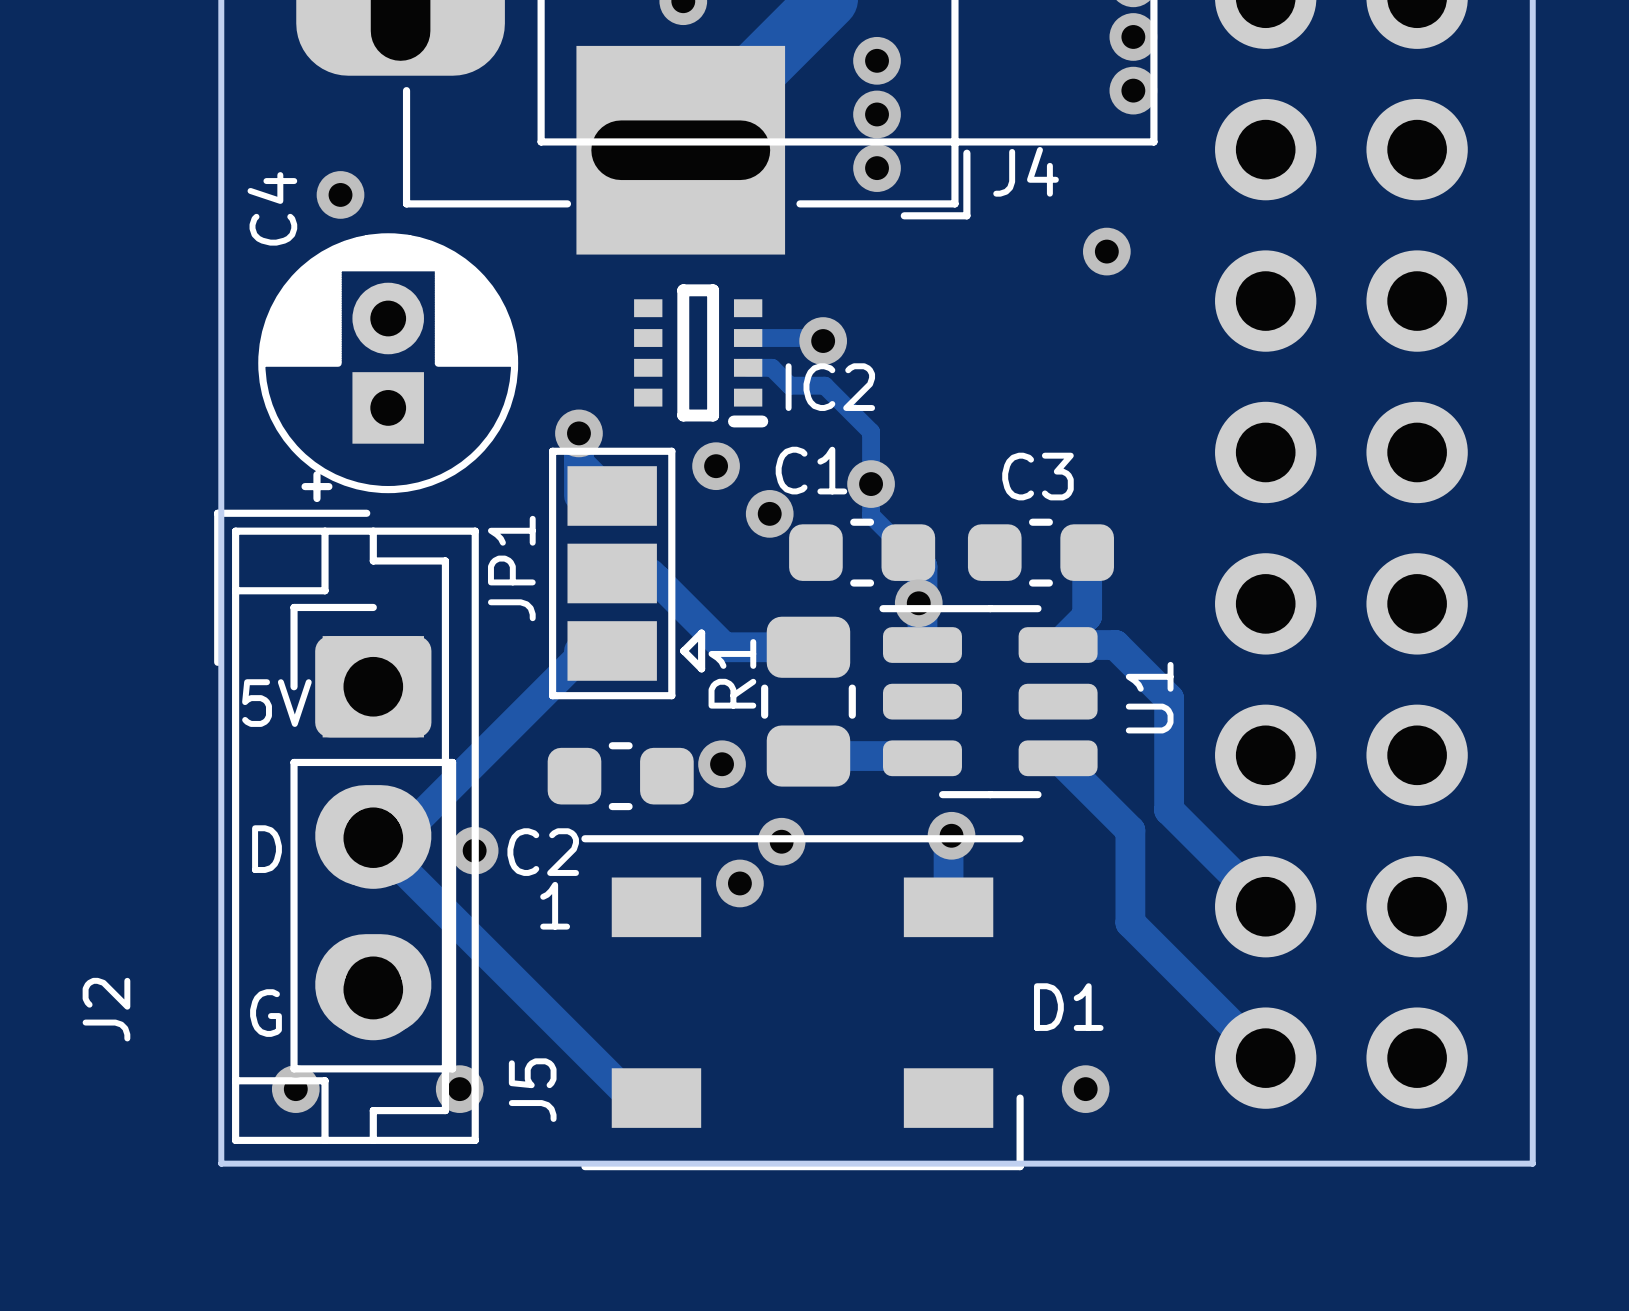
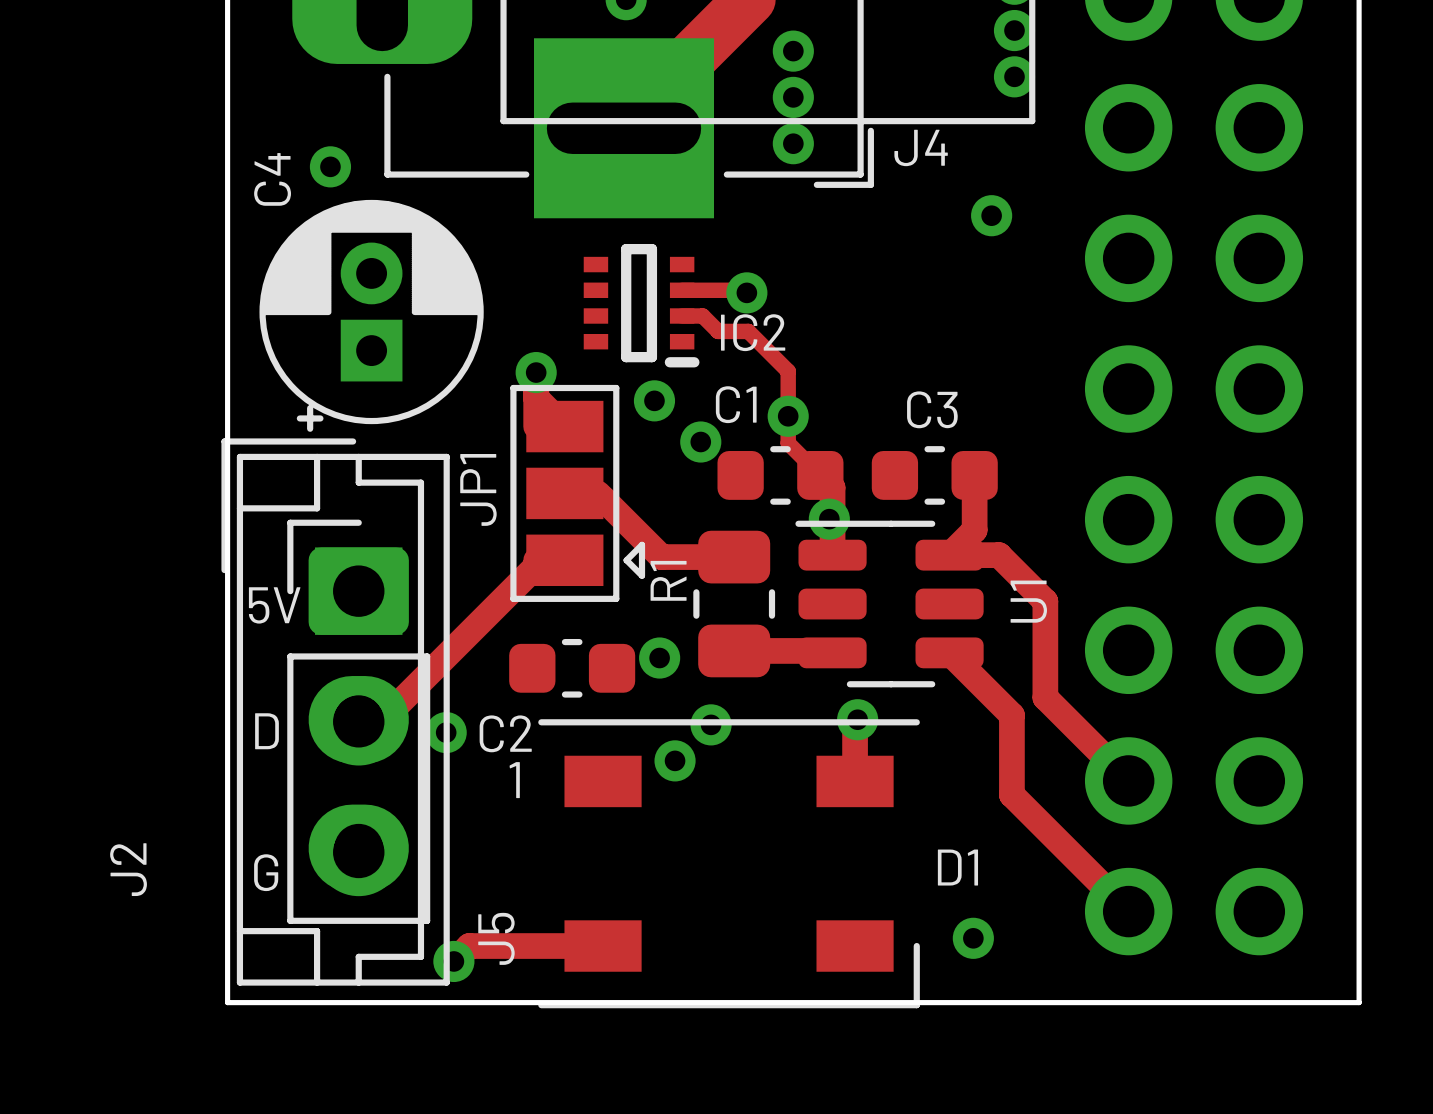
track: (385, 851) (631, 1098) -> (453, 961) (469, 946) (581, 946)
via: (295, 1089) -> none
via position: (459, 1089) -> (453, 961)

